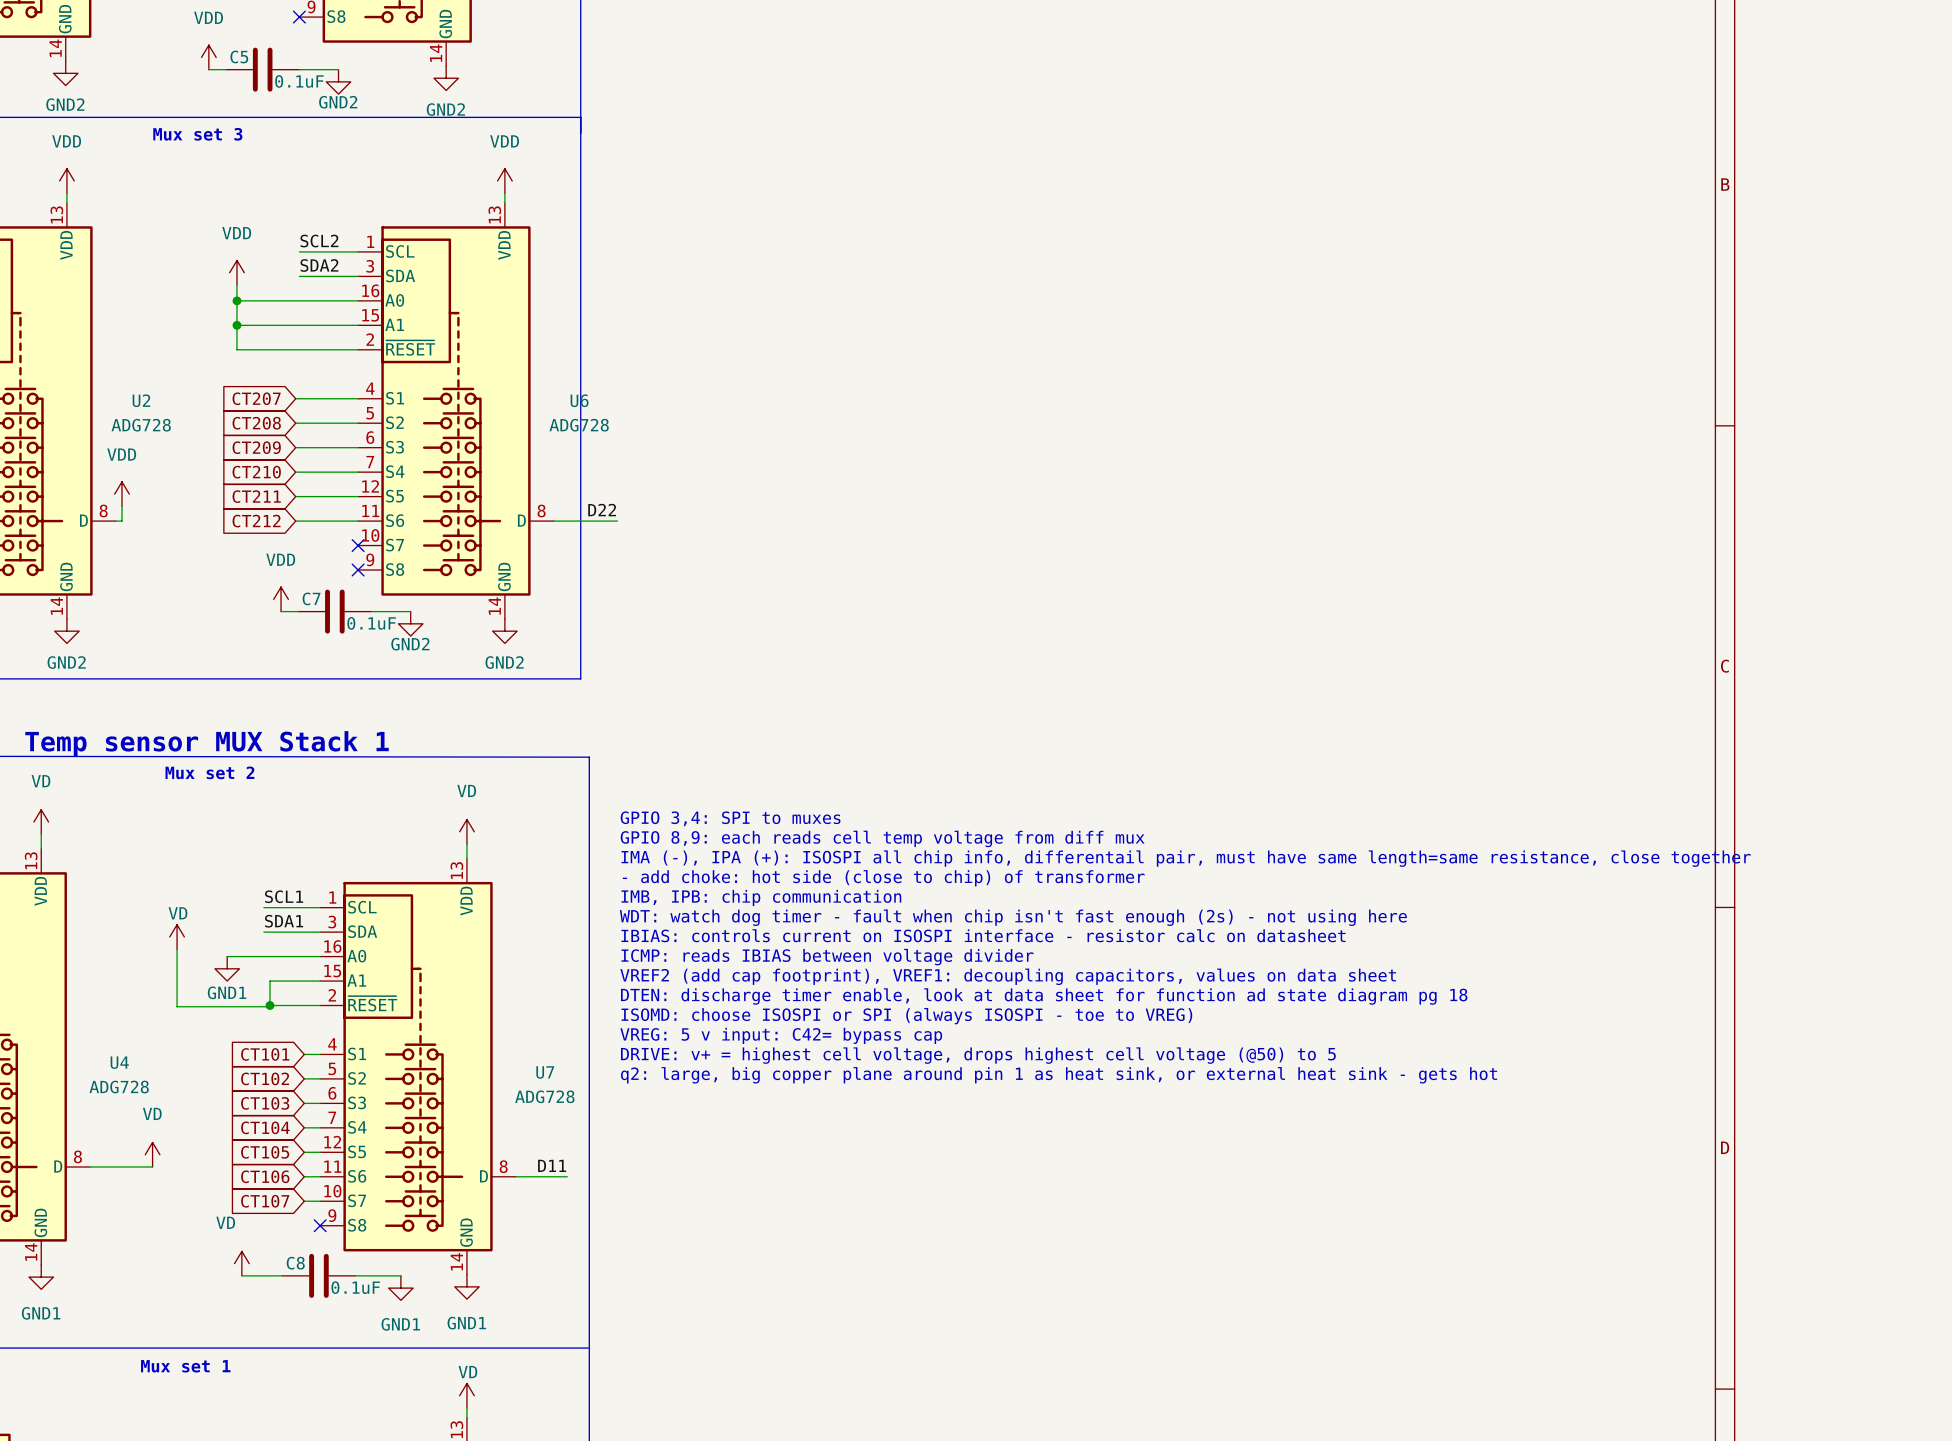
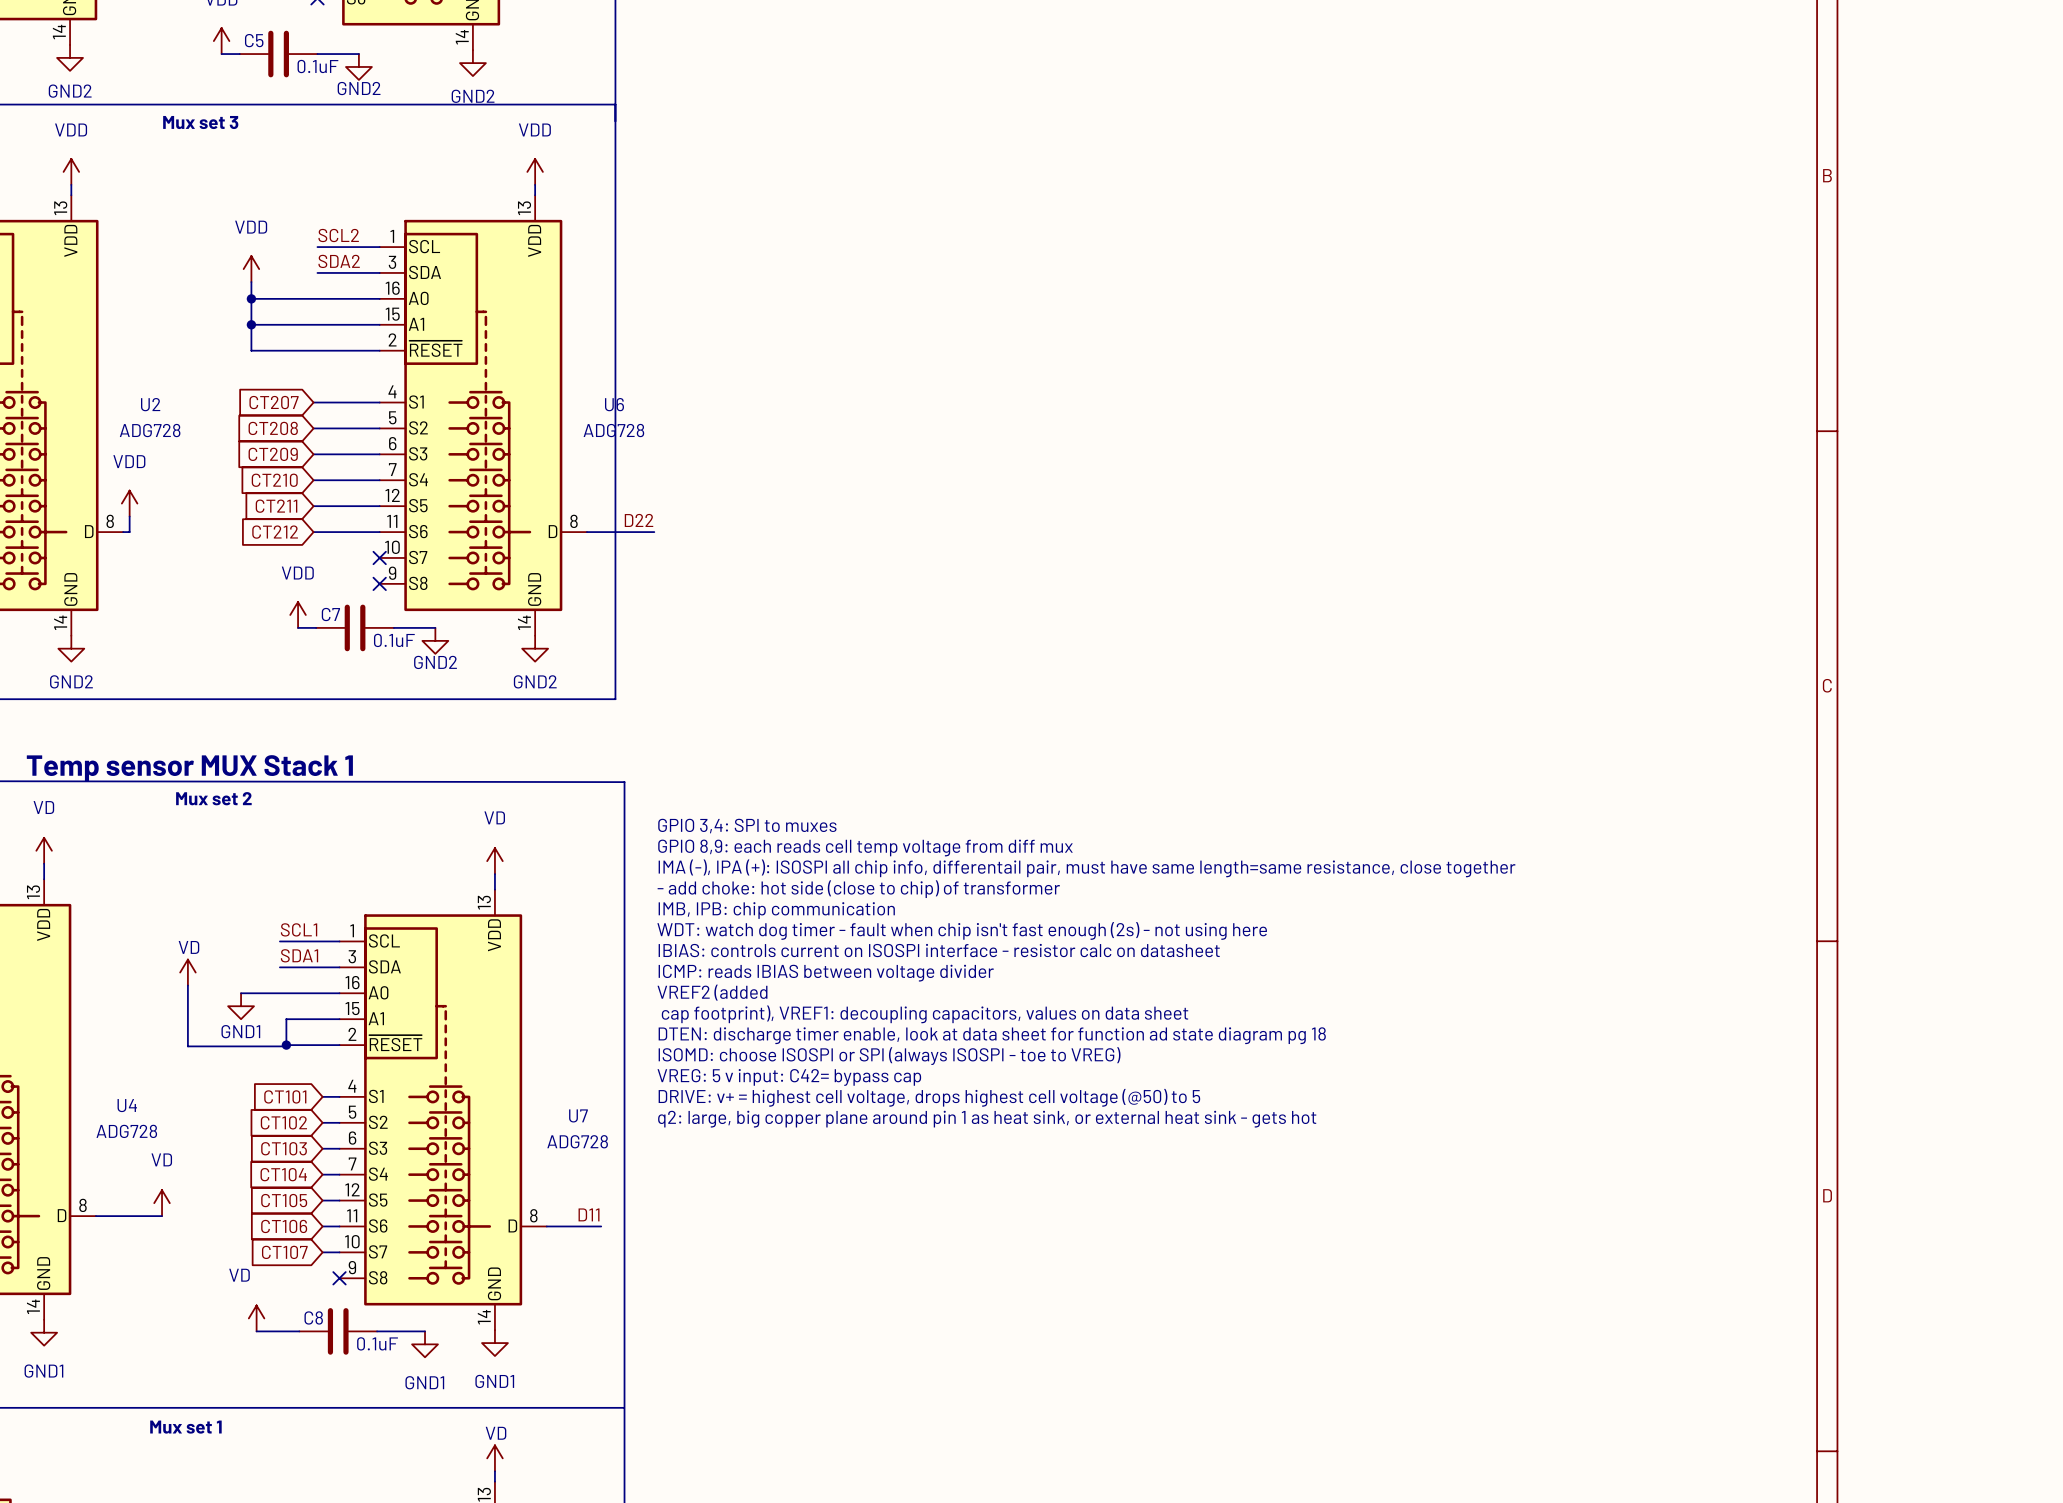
text: none -> GPIO 3,4: SPI to muxes (747, 826)
text: GPIO 3,4: SPI to muxes (730, 818) -> GPIO 8,9: each reads cell temp voltage from diff mux (865, 847)
text: GPIO 8,9: each reads cell temp voltage from diff mux (882, 838) -> IMA (-), IPA (+): ISOSPI all chip info, differentail pair, must have same length=same resistance, close together (1087, 868)
text: IMA (-), IPA (+): ISOSPI all chip info, differentail pair, must have same length=same resistance, close together (1186, 858) -> - add choke: hot side (close to chip) of transformer (858, 889)
text: - add choke: hot side (close to chip) of transformer (883, 878) -> IMB, IPB: chip communication (776, 910)
text: IMB, IPB: chip communication (761, 898) -> WDT: watch dog timer - fault when chip isn't fast enough (2s) - not using here (962, 930)
text: WDT: watch dog timer - fault when chip isn't fast enough (2s) - not using here (1013, 917) -> IBIAS: controls current on ISOSPI interface - resistor calc on datasheet (939, 950)
text: IBIAS: controls current on ISOSPI interface - resistor calc on datasheet (983, 935) -> ICMP: reads IBIAS between voltage divider (826, 973)
text: ICMP: reads IBIAS between voltage divider (827, 957) -> VREF2 (added (712, 992)
text: VREF2 (add cap footprint), VREF1: decoupling capacitors, values on data sheet (1008, 976) -> cap footprint), VREF1: decoupling capacitors, values on data sheet (925, 1014)

